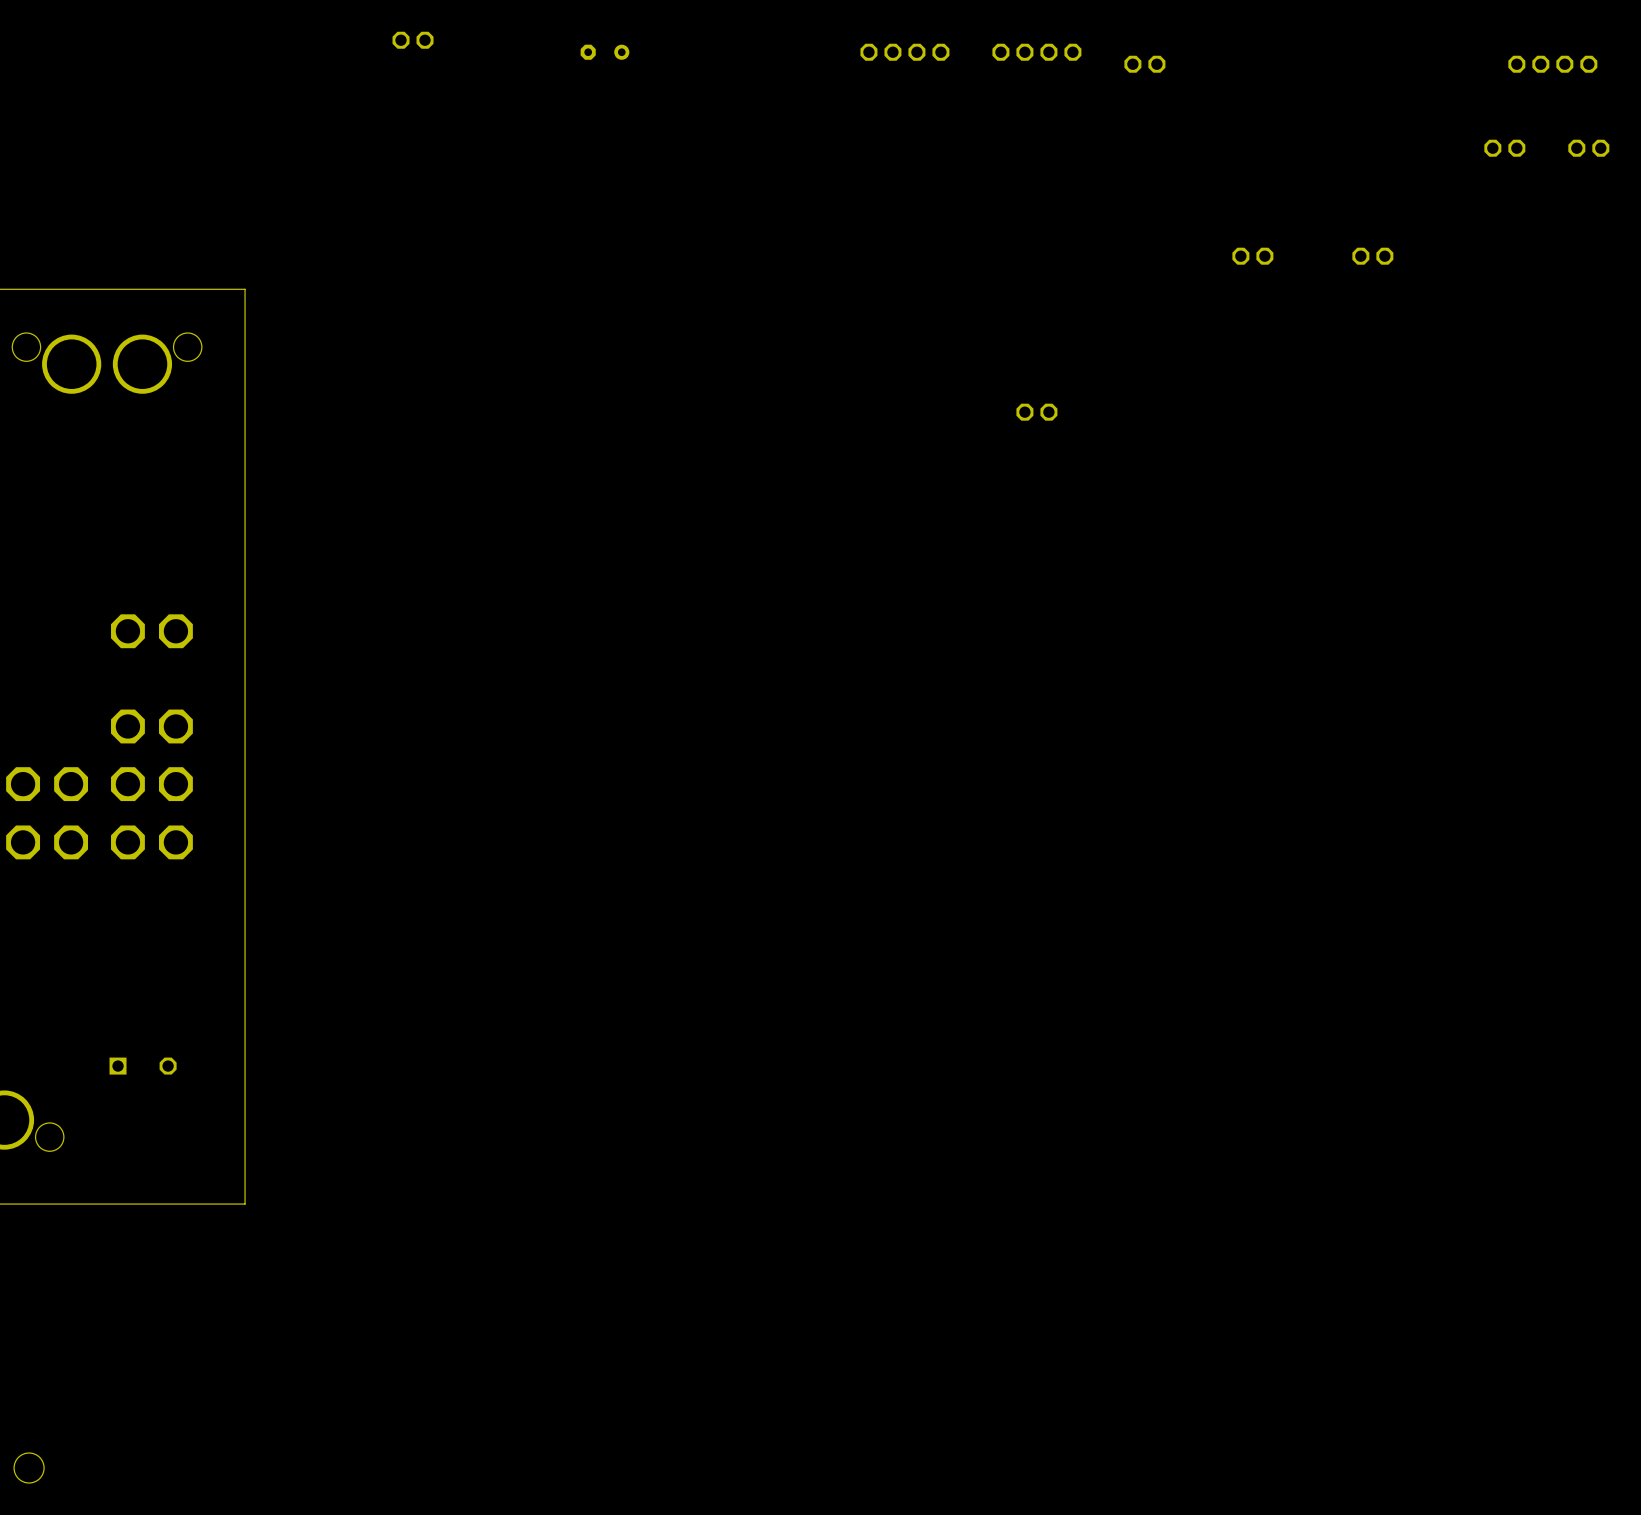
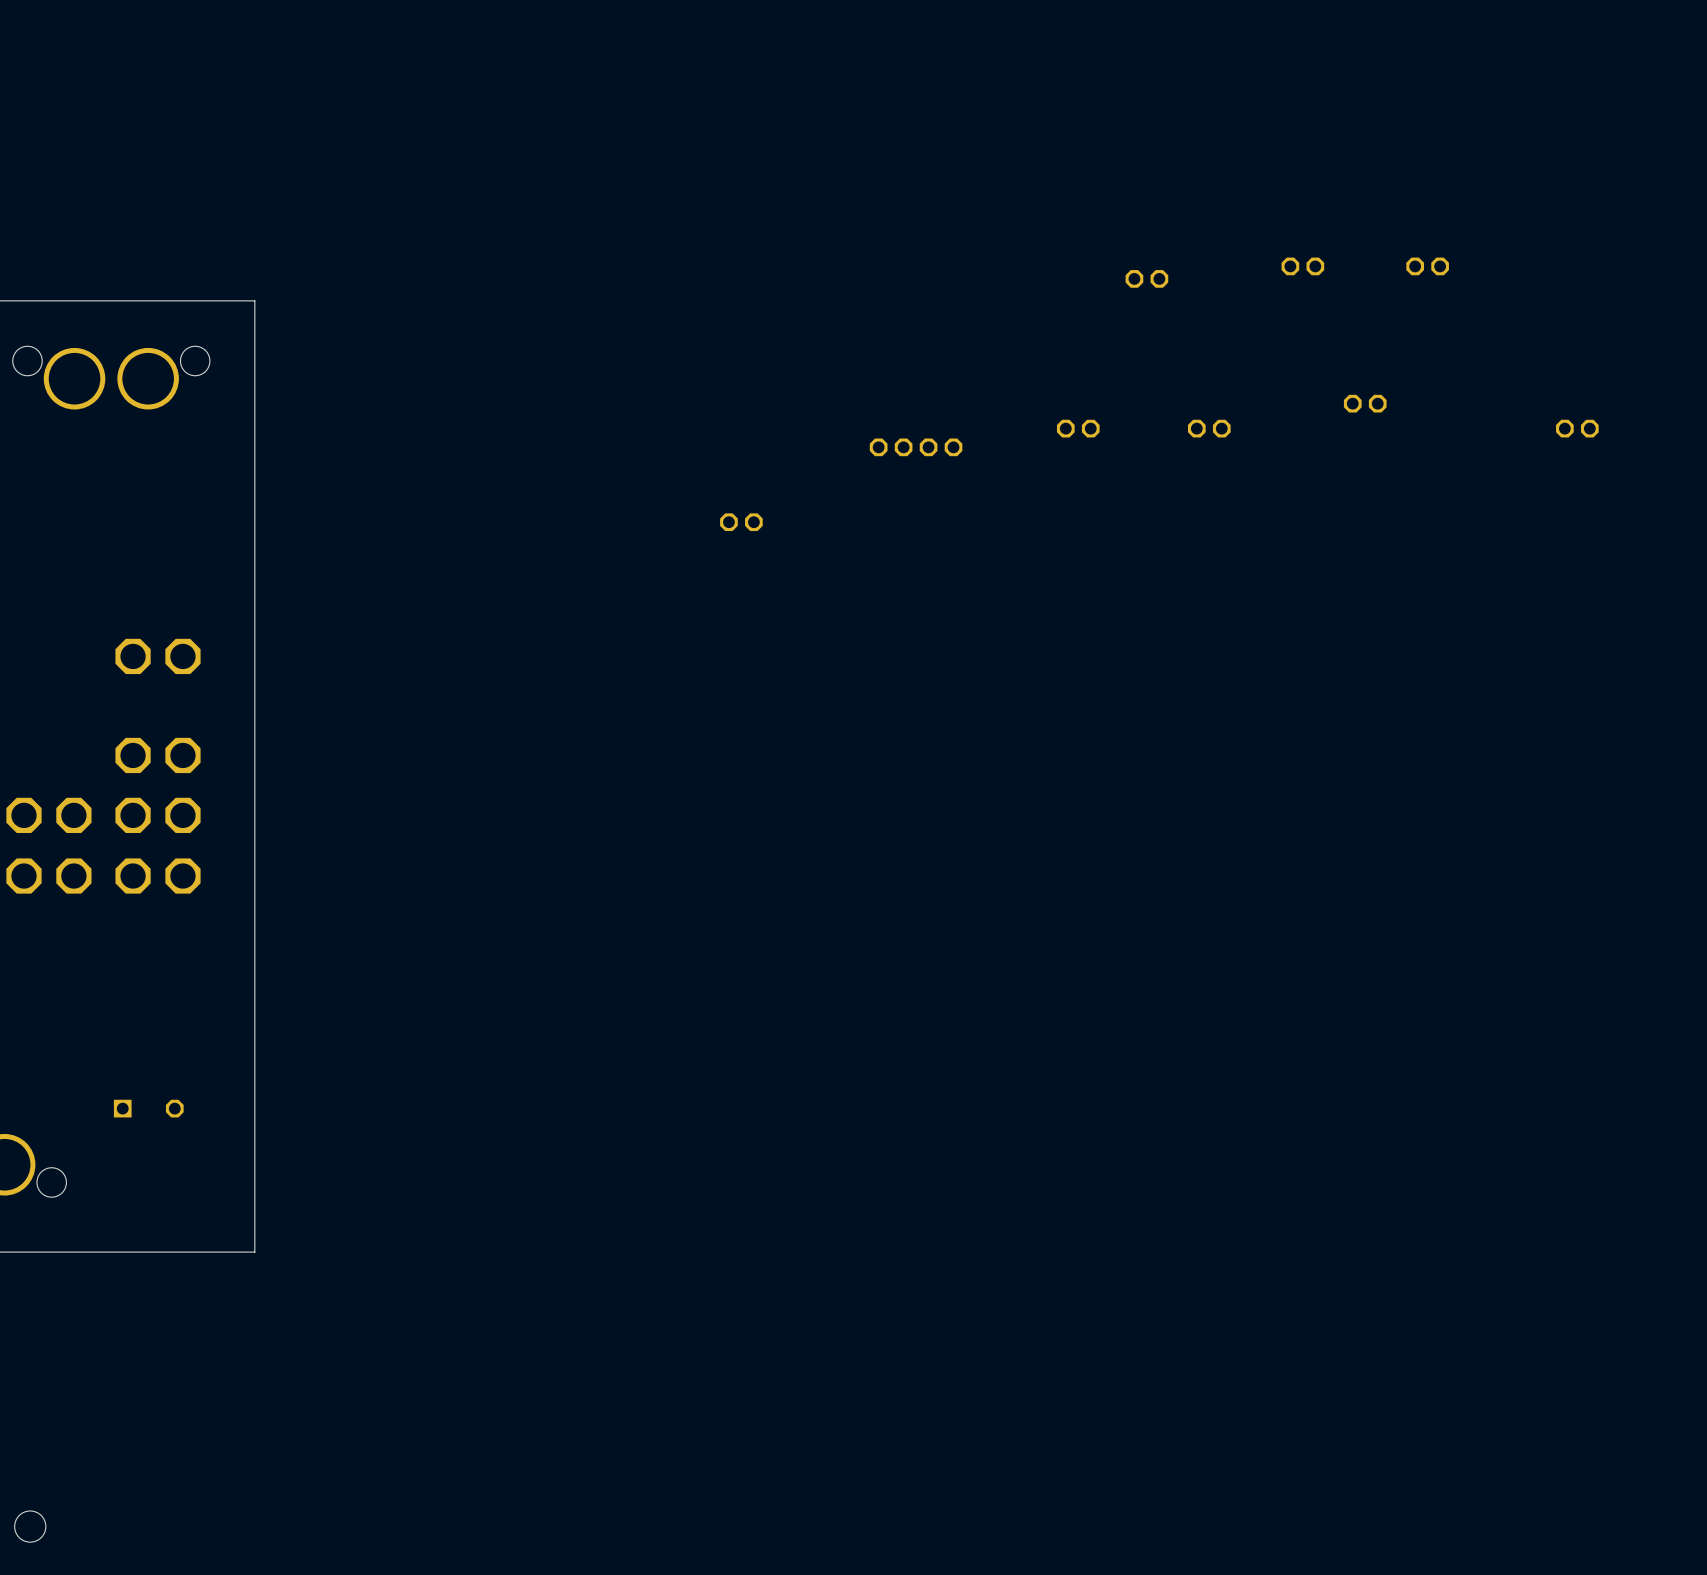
part: (413, 40) -> none
part: (604, 52) -> none
part: (904, 52) -> none
part: (1036, 52) -> none
part: (1144, 64) -> none
part: (1552, 64) -> none
part: (1504, 148) -> none
part: (1588, 148) -> none
part: none -> (1146, 278)
part: none -> (1365, 403)
part: none -> (1209, 428)
part: none -> (1577, 428)
part: none -> (916, 447)
part: none -> (741, 522)

